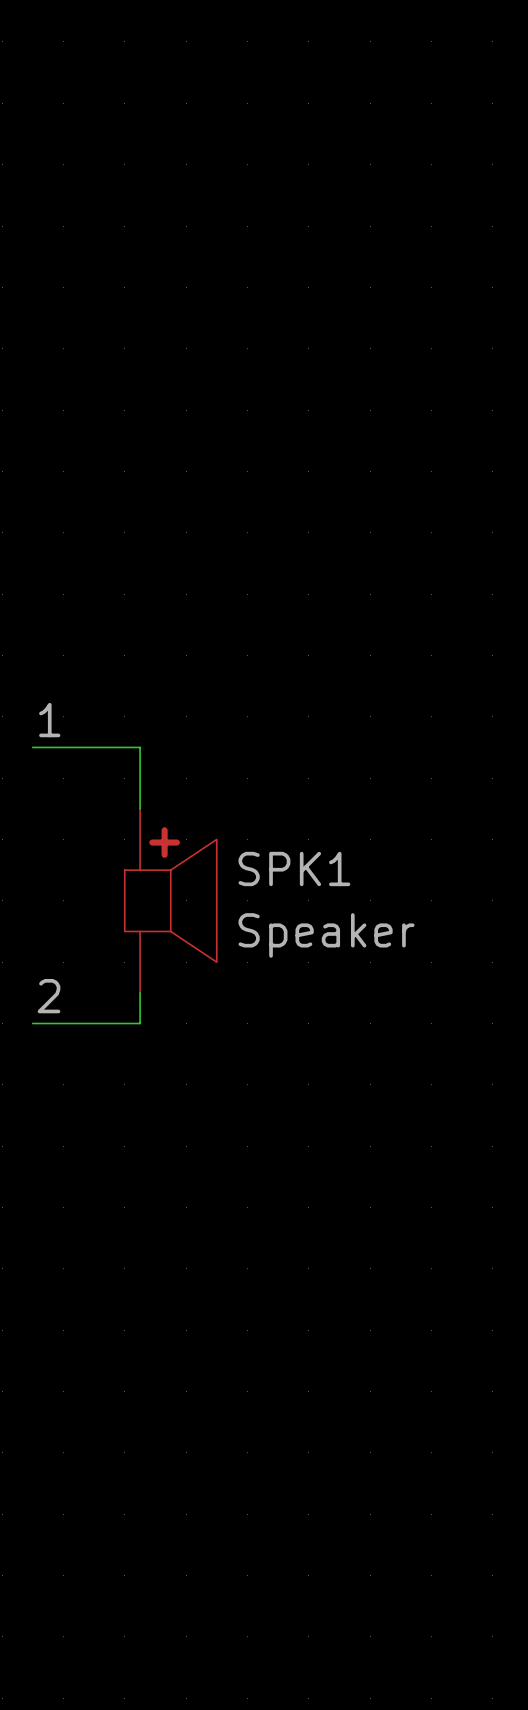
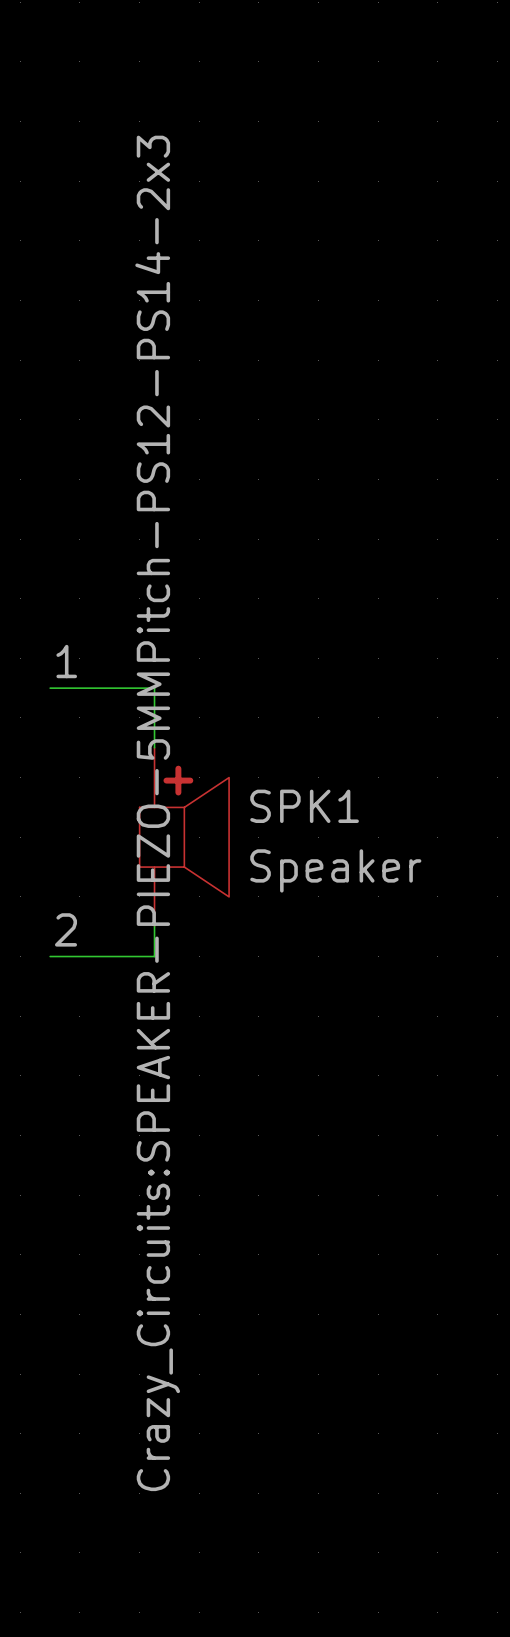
SPK1 text: none -> Crazy_Circuits:SPEAKER-PIEZO-5MMPitch-PS12-PS14-2x3 (157, 813)

